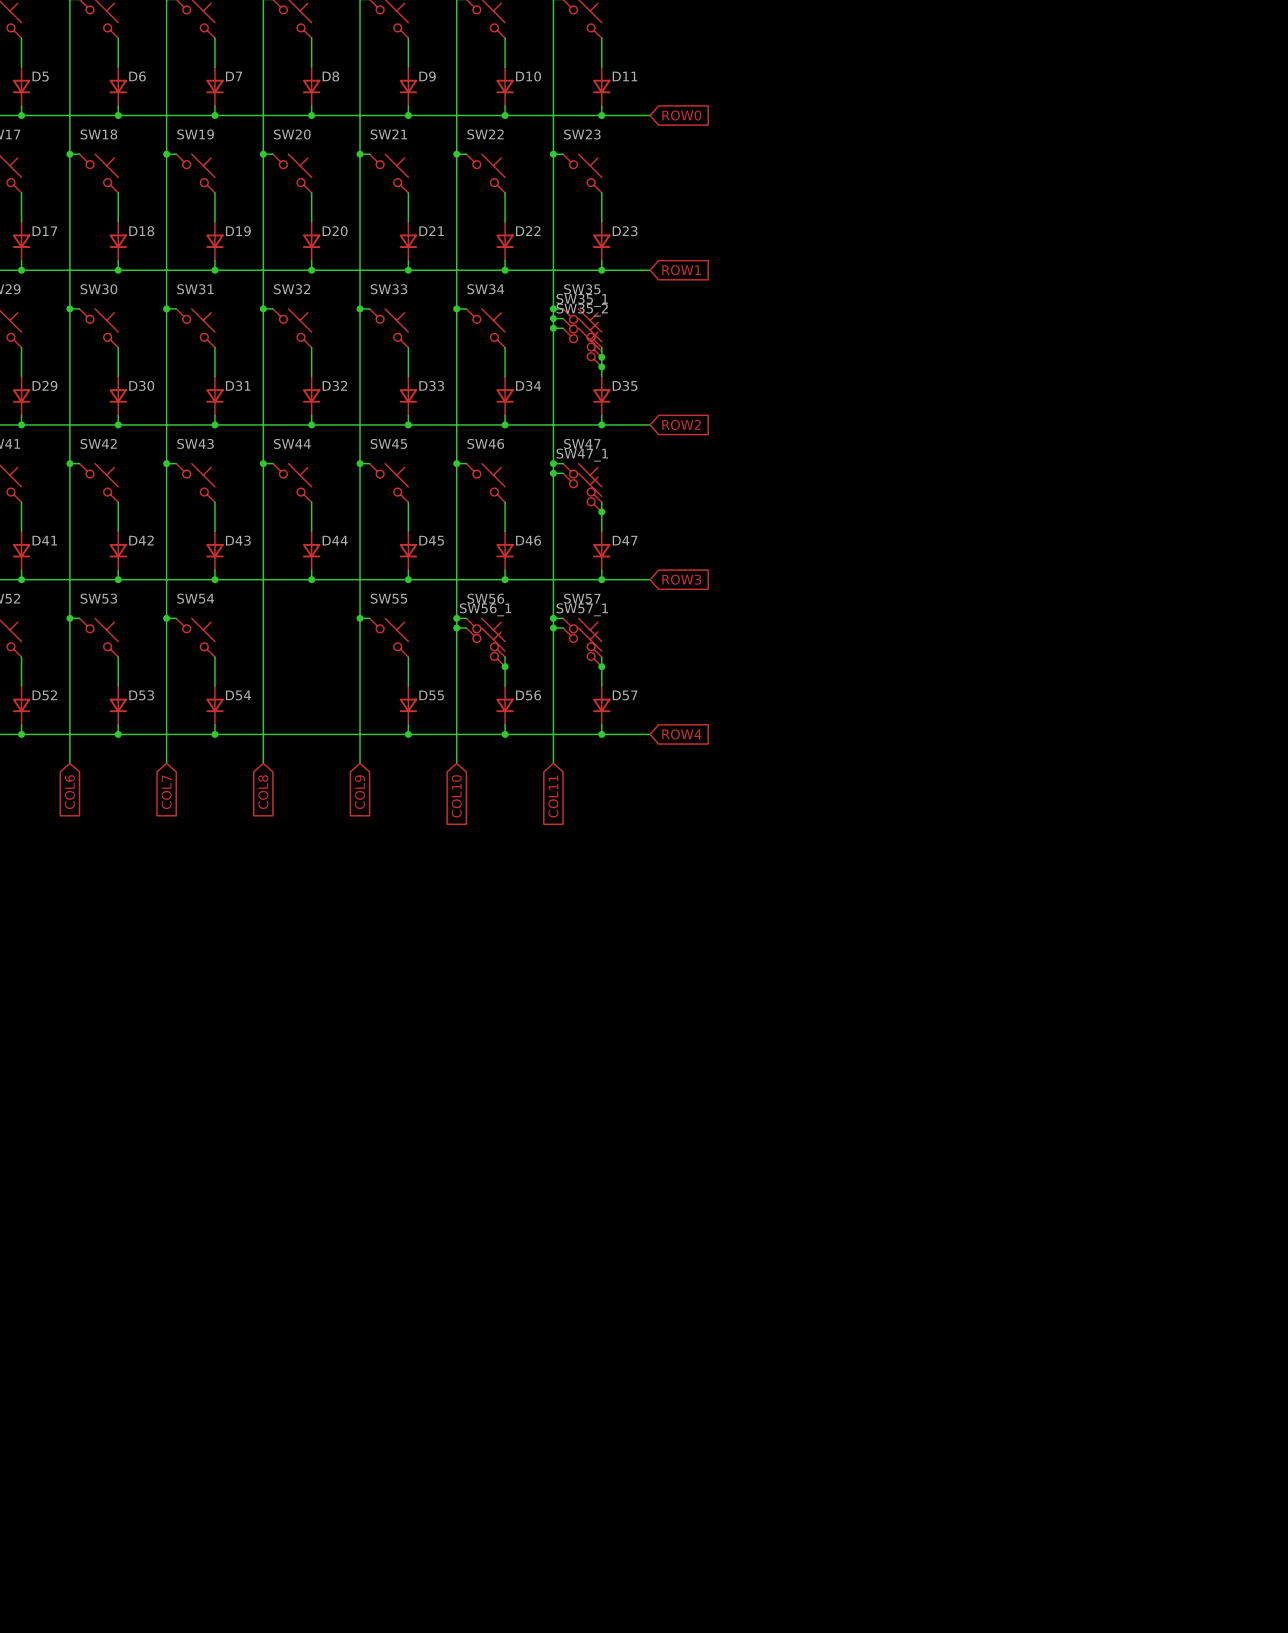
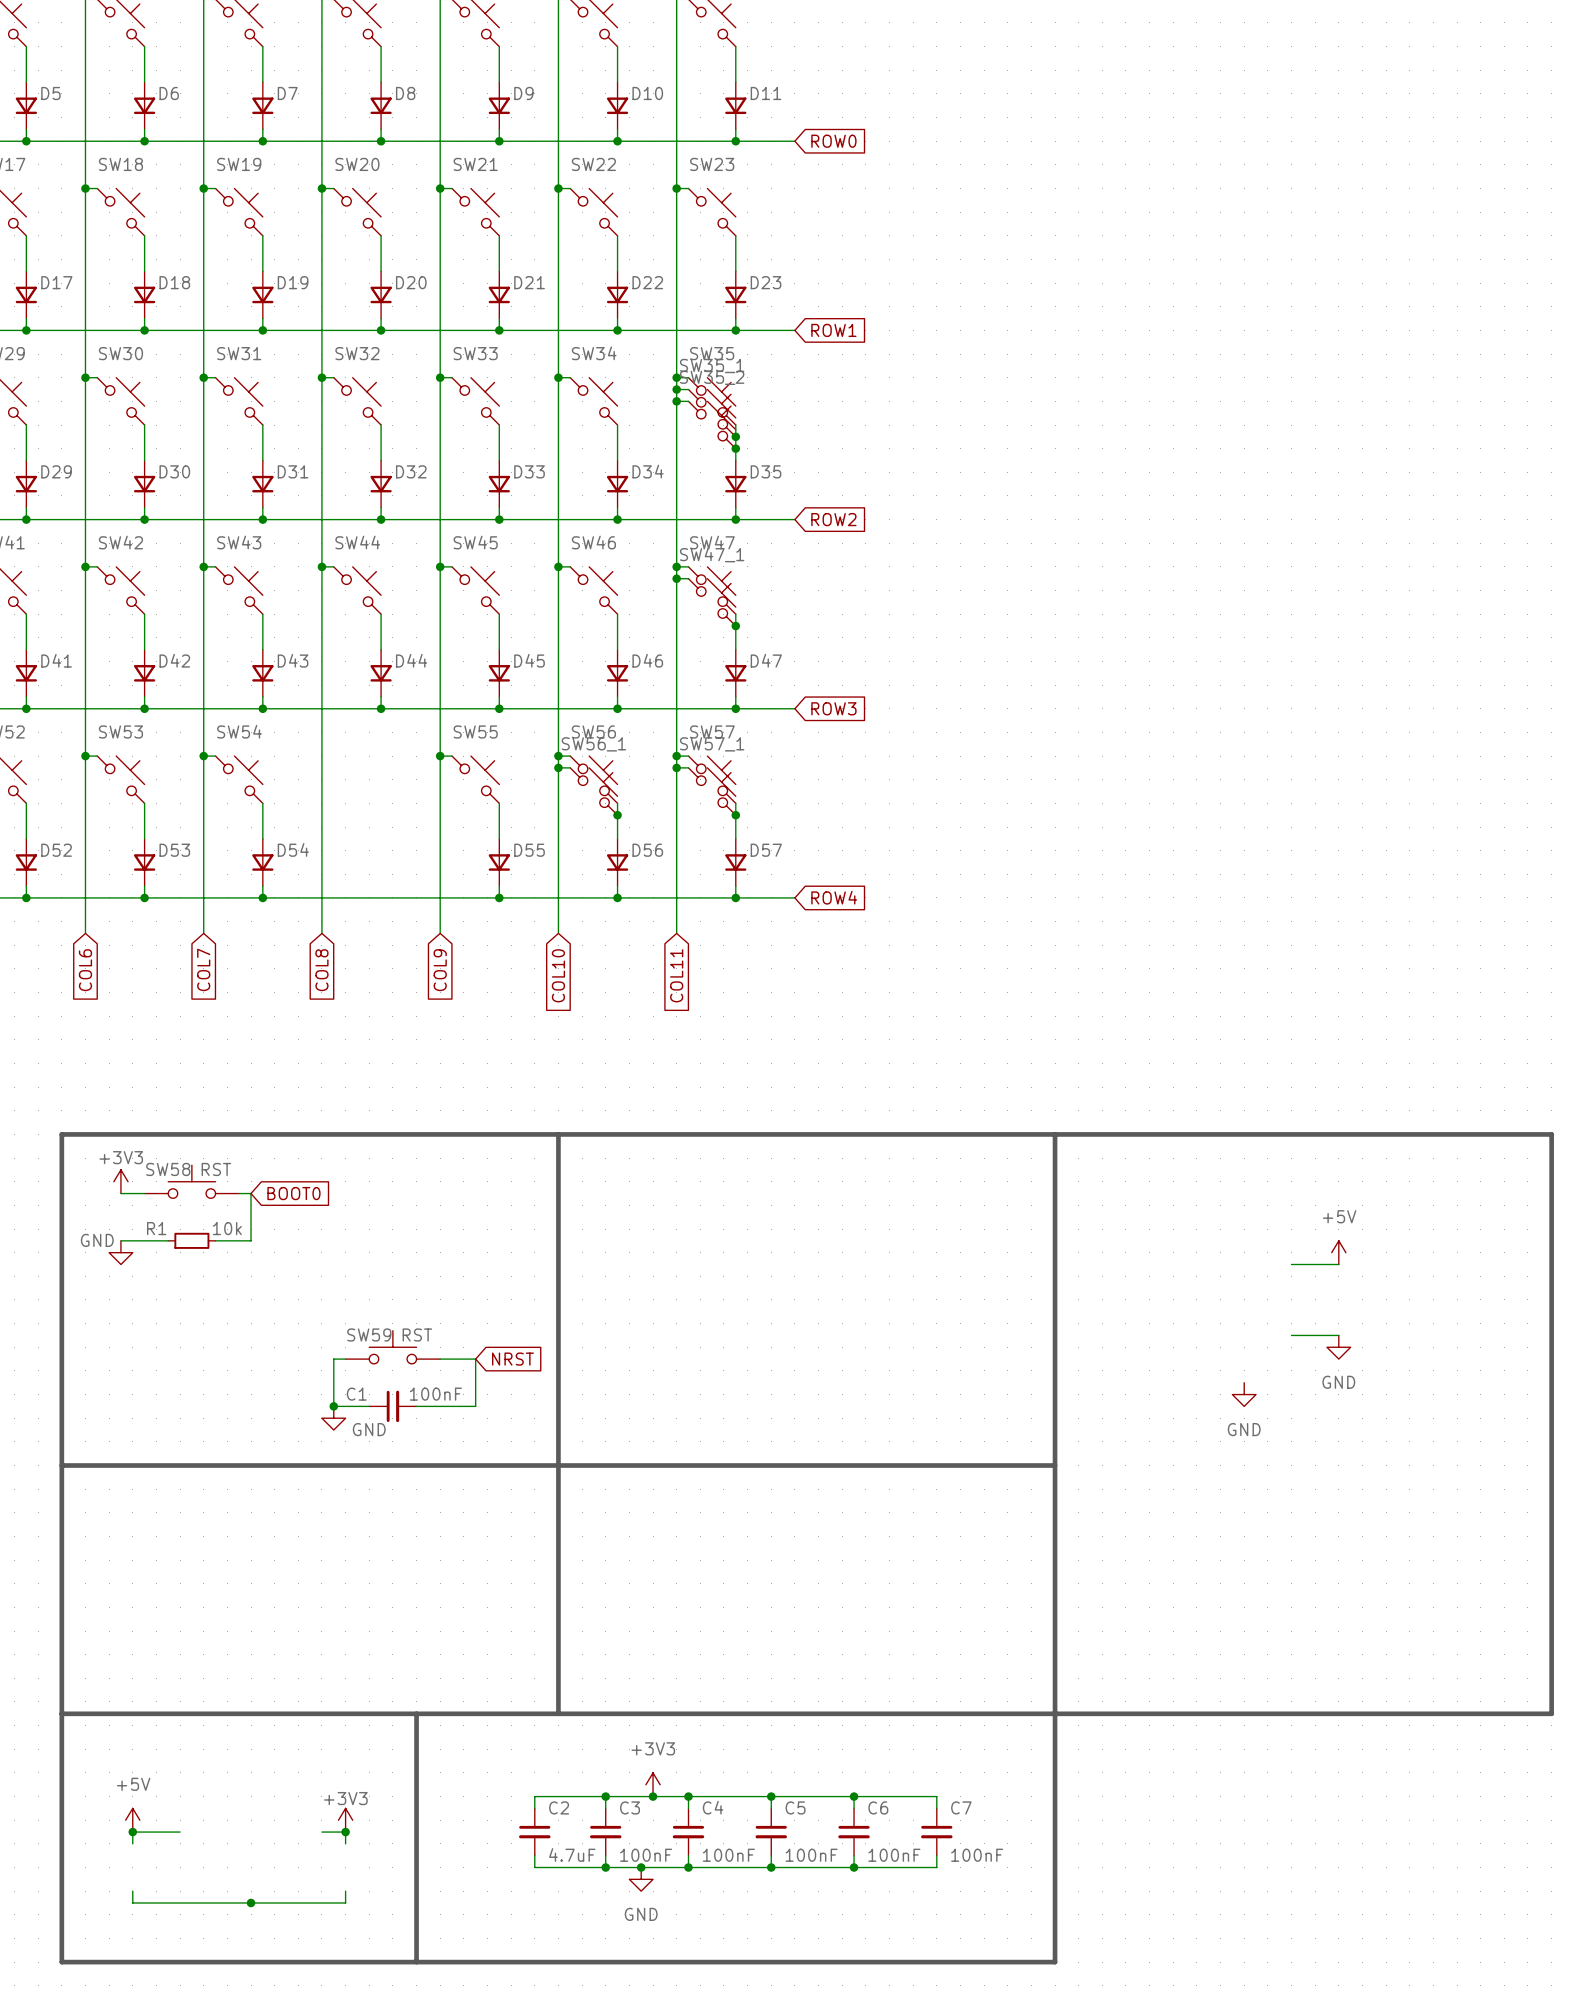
line: none -> (558, 1134) (558, 1713)
line: none -> (1055, 1134) (1055, 1962) (61, 1962) (61, 1134) (1551, 1134) (1551, 1713) (61, 1713)
power symbol: none -> +3V3 (120, 1181)
SW58: none -> RST (191, 1181)
wire: none -> (120, 1193) (144, 1193)
wire: none -> (239, 1193) (251, 1193) (251, 1240) (215, 1240)
global label: none -> BOOT0 (293, 1193)
wire: none -> (120, 1240) (168, 1240)
R1: none -> 10k (191, 1240)
power symbol: none -> GND (120, 1252)
power symbol: none -> +5V (1338, 1252)
wire: none -> (1291, 1264) (1338, 1264)
wire: none -> (1291, 1335) (1338, 1335)
SW59: none -> RST (392, 1347)
power symbol: none -> GND (1338, 1347)
wire: none -> (345, 1359) (333, 1359) (333, 1406) (369, 1406)
wire: none -> (440, 1359) (475, 1359) (475, 1406) (416, 1406)
global label: none -> NRST (512, 1359)
power symbol: none -> GND (1244, 1394)
junction: none -> (333, 1406)
C1: none -> 100nF (392, 1406)
power symbol: none -> GND (333, 1418)
line: none -> (61, 1465) (1055, 1465)
line: none -> (416, 1713) (416, 1962)
power symbol: none -> +3V3 (653, 1784)
wire: none -> (605, 1796) (605, 1808)
junction: none -> (605, 1796)
junction: none -> (653, 1796)
wire: none -> (688, 1796) (688, 1808)
junction: none -> (688, 1796)
wire: none -> (771, 1796) (771, 1808)
junction: none -> (771, 1796)
wire: none -> (854, 1796) (854, 1808)
junction: none -> (854, 1796)
wire: none -> (534, 1808) (534, 1796) (936, 1796) (936, 1808)
power symbol: none -> +5V (132, 1820)
power symbol: none -> +3V3 (345, 1820)
junction: none -> (132, 1832)
wire: none -> (180, 1832) (132, 1832) (132, 1843)
wire: none -> (321, 1832) (345, 1832) (345, 1843)
junction: none -> (345, 1832)
C2: none -> 4.7uF (534, 1832)
C3: none -> 100nF (605, 1832)
C4: none -> 100nF (688, 1832)
C5: none -> 100nF (771, 1832)
C6: none -> 100nF (854, 1832)
C7: none -> 100nF (936, 1832)
wire: none -> (534, 1855) (534, 1867) (936, 1867) (936, 1855)
wire: none -> (605, 1855) (605, 1867)
wire: none -> (688, 1855) (688, 1867)
wire: none -> (771, 1855) (771, 1867)
wire: none -> (854, 1855) (854, 1867)
junction: none -> (605, 1867)
junction: none -> (641, 1867)
junction: none -> (688, 1867)
junction: none -> (771, 1867)
junction: none -> (854, 1867)
power symbol: none -> GND (641, 1879)
wire: none -> (132, 1891) (132, 1902) (345, 1902) (345, 1891)
junction: none -> (251, 1902)

